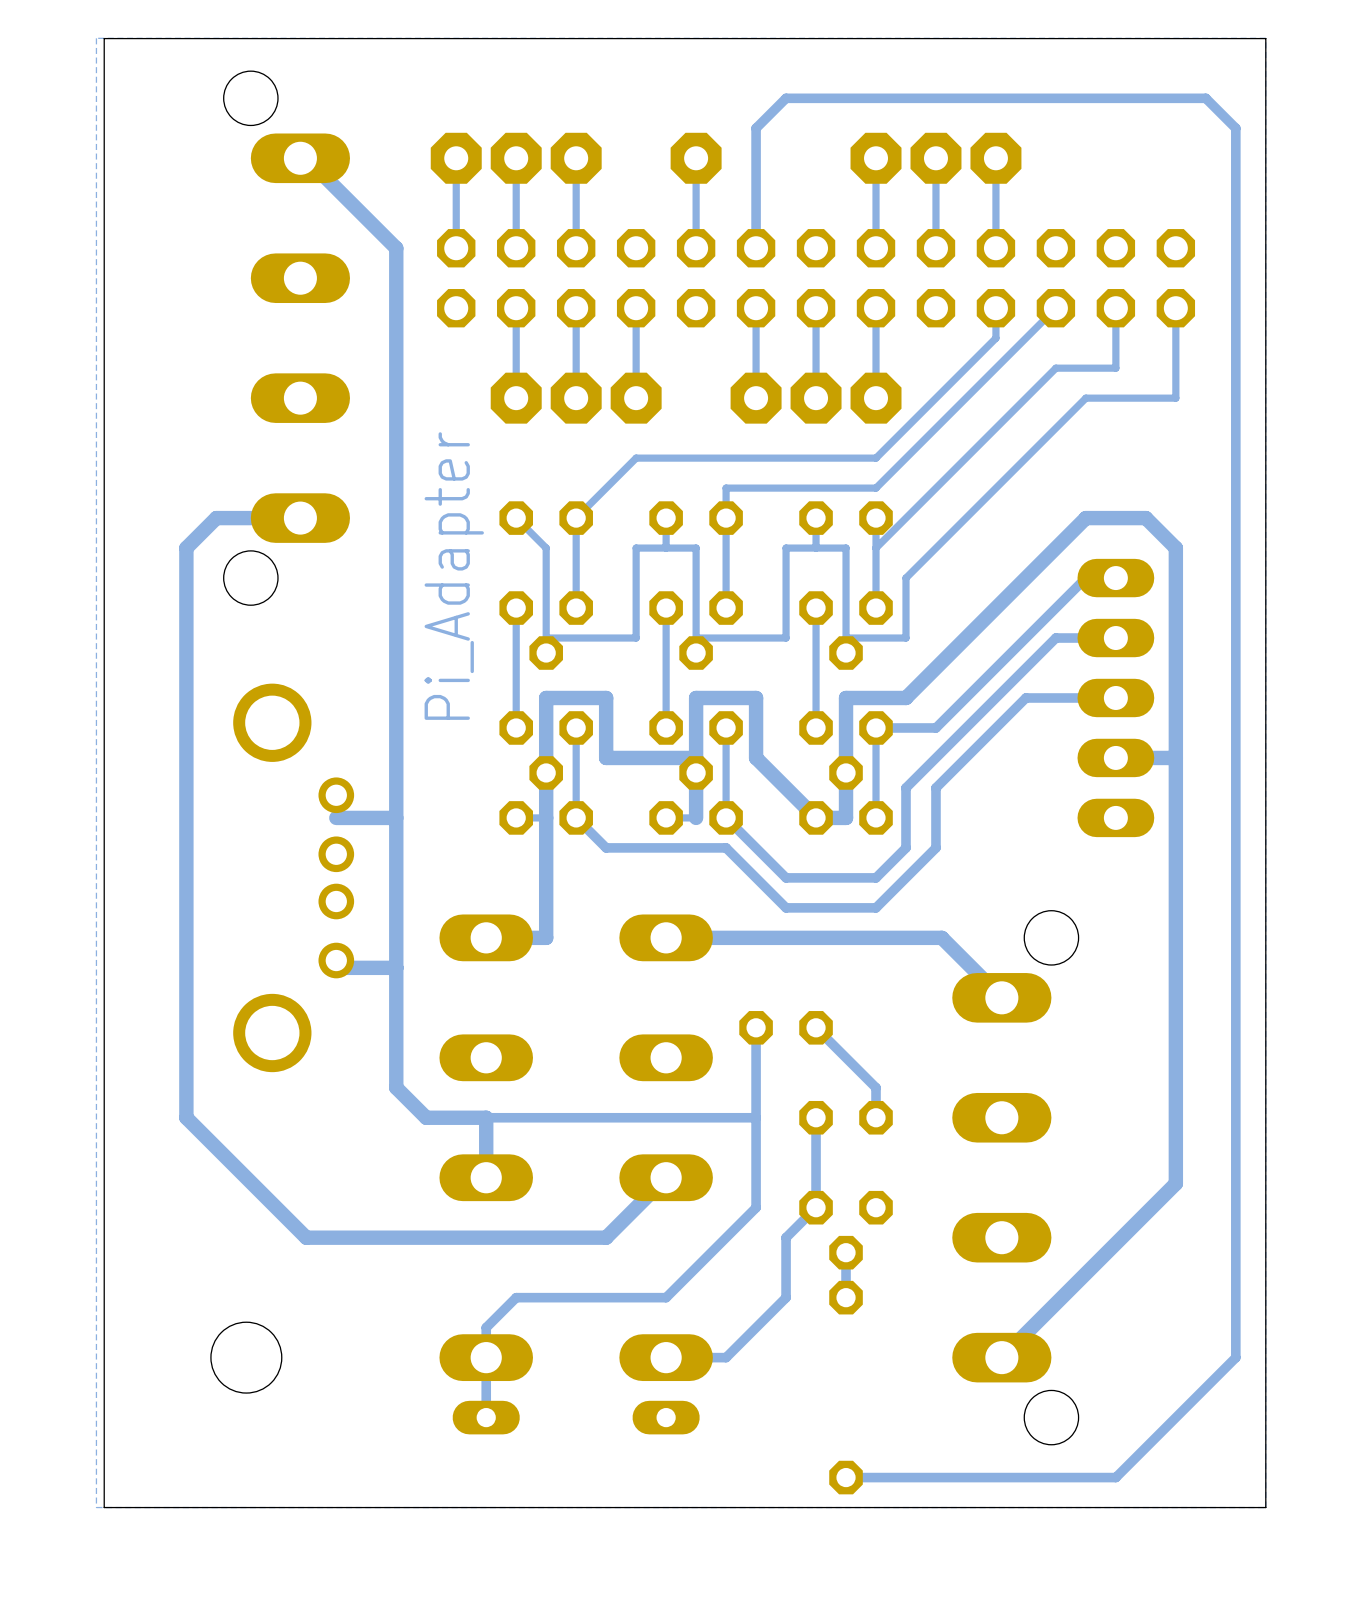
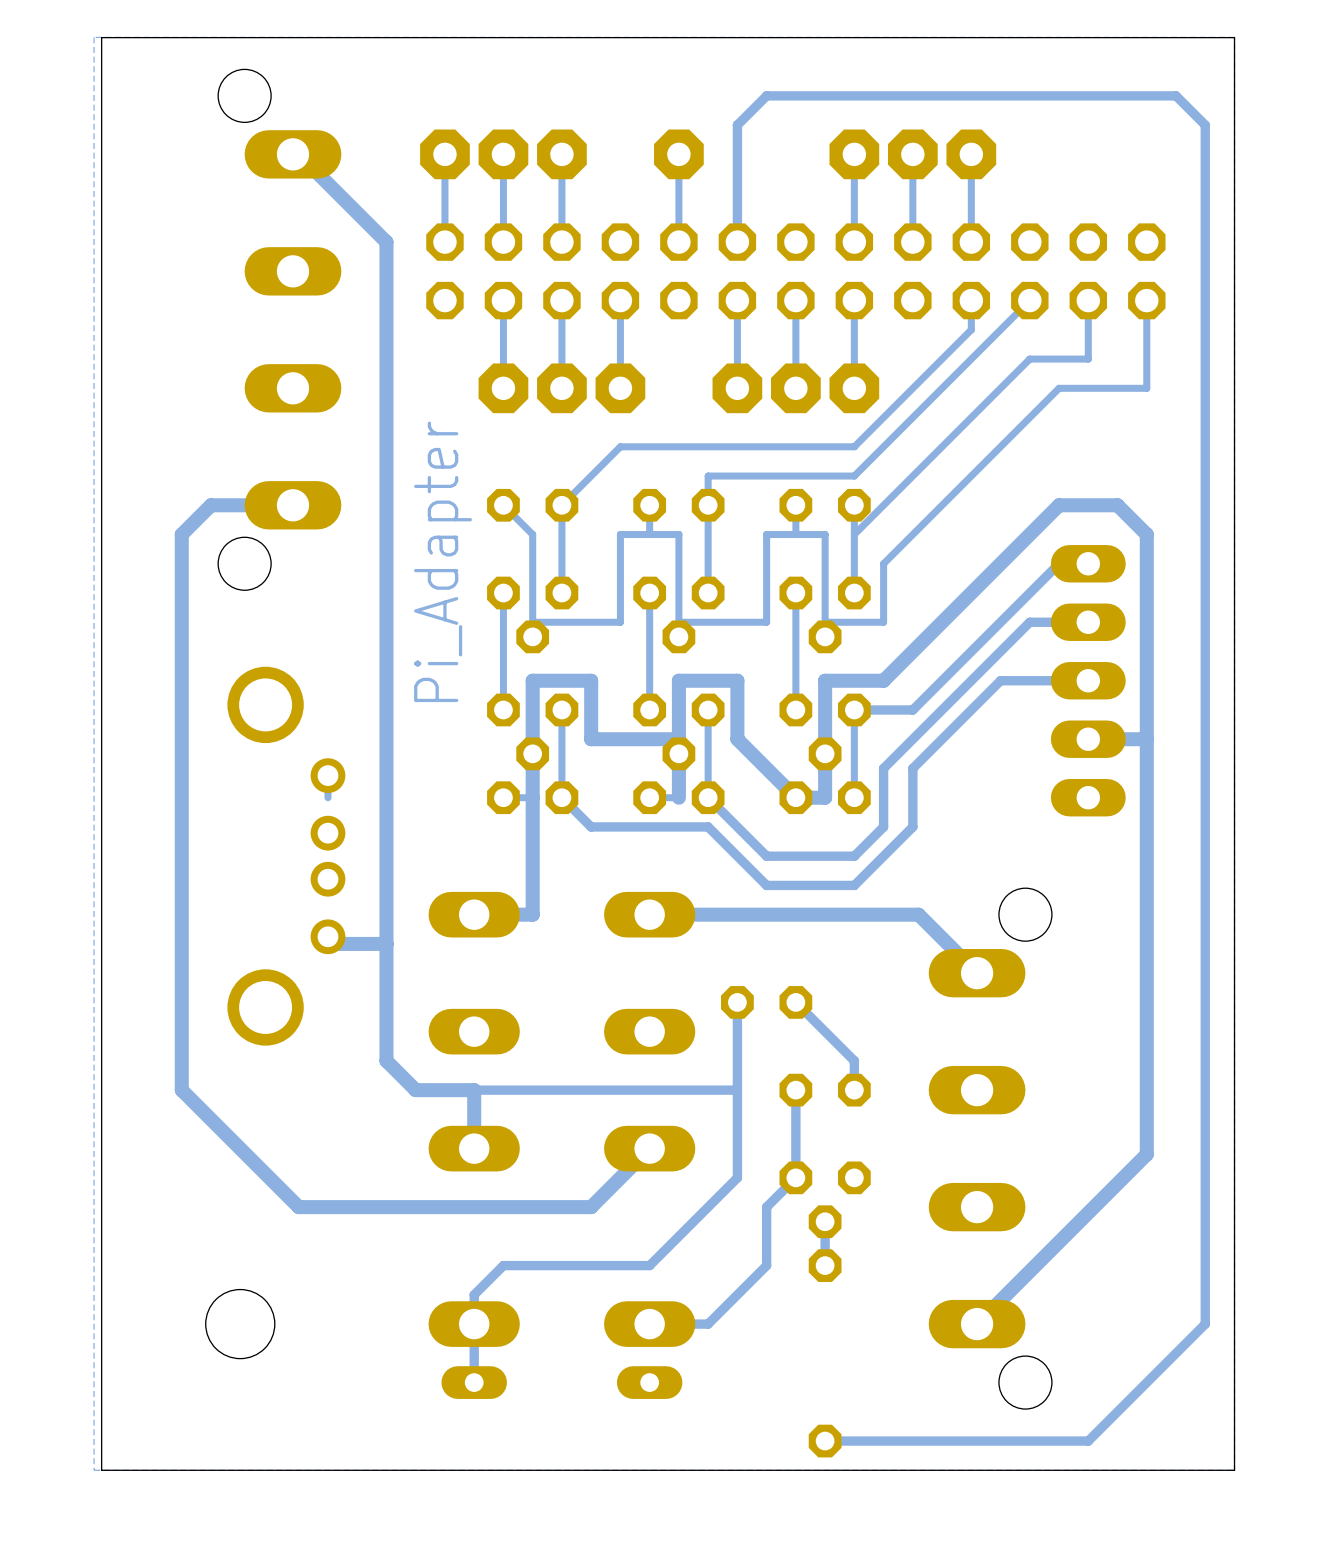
bottom track: (396, 817) (336, 817) -> none

